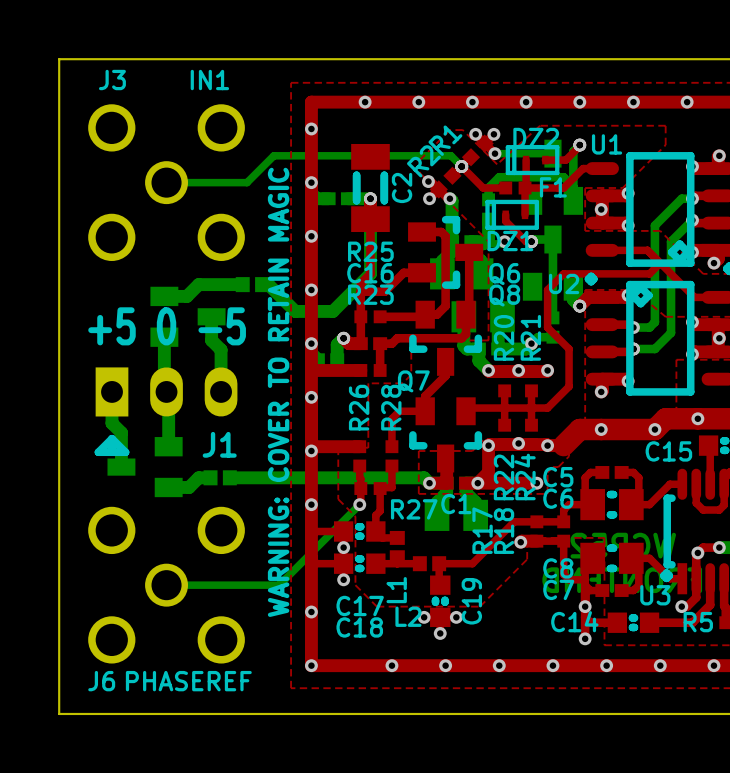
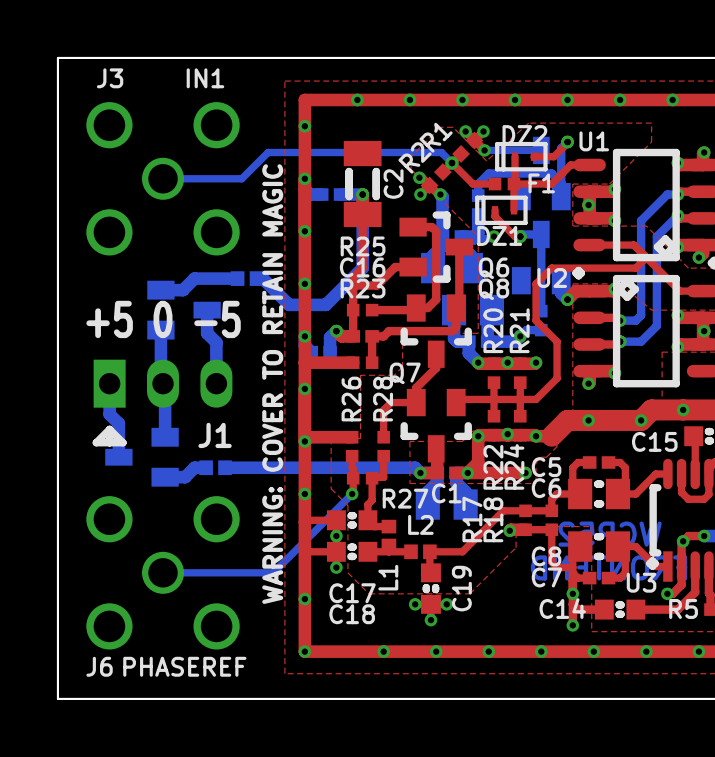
L2 name position: L2 (408, 616) -> L2 (420, 524)

